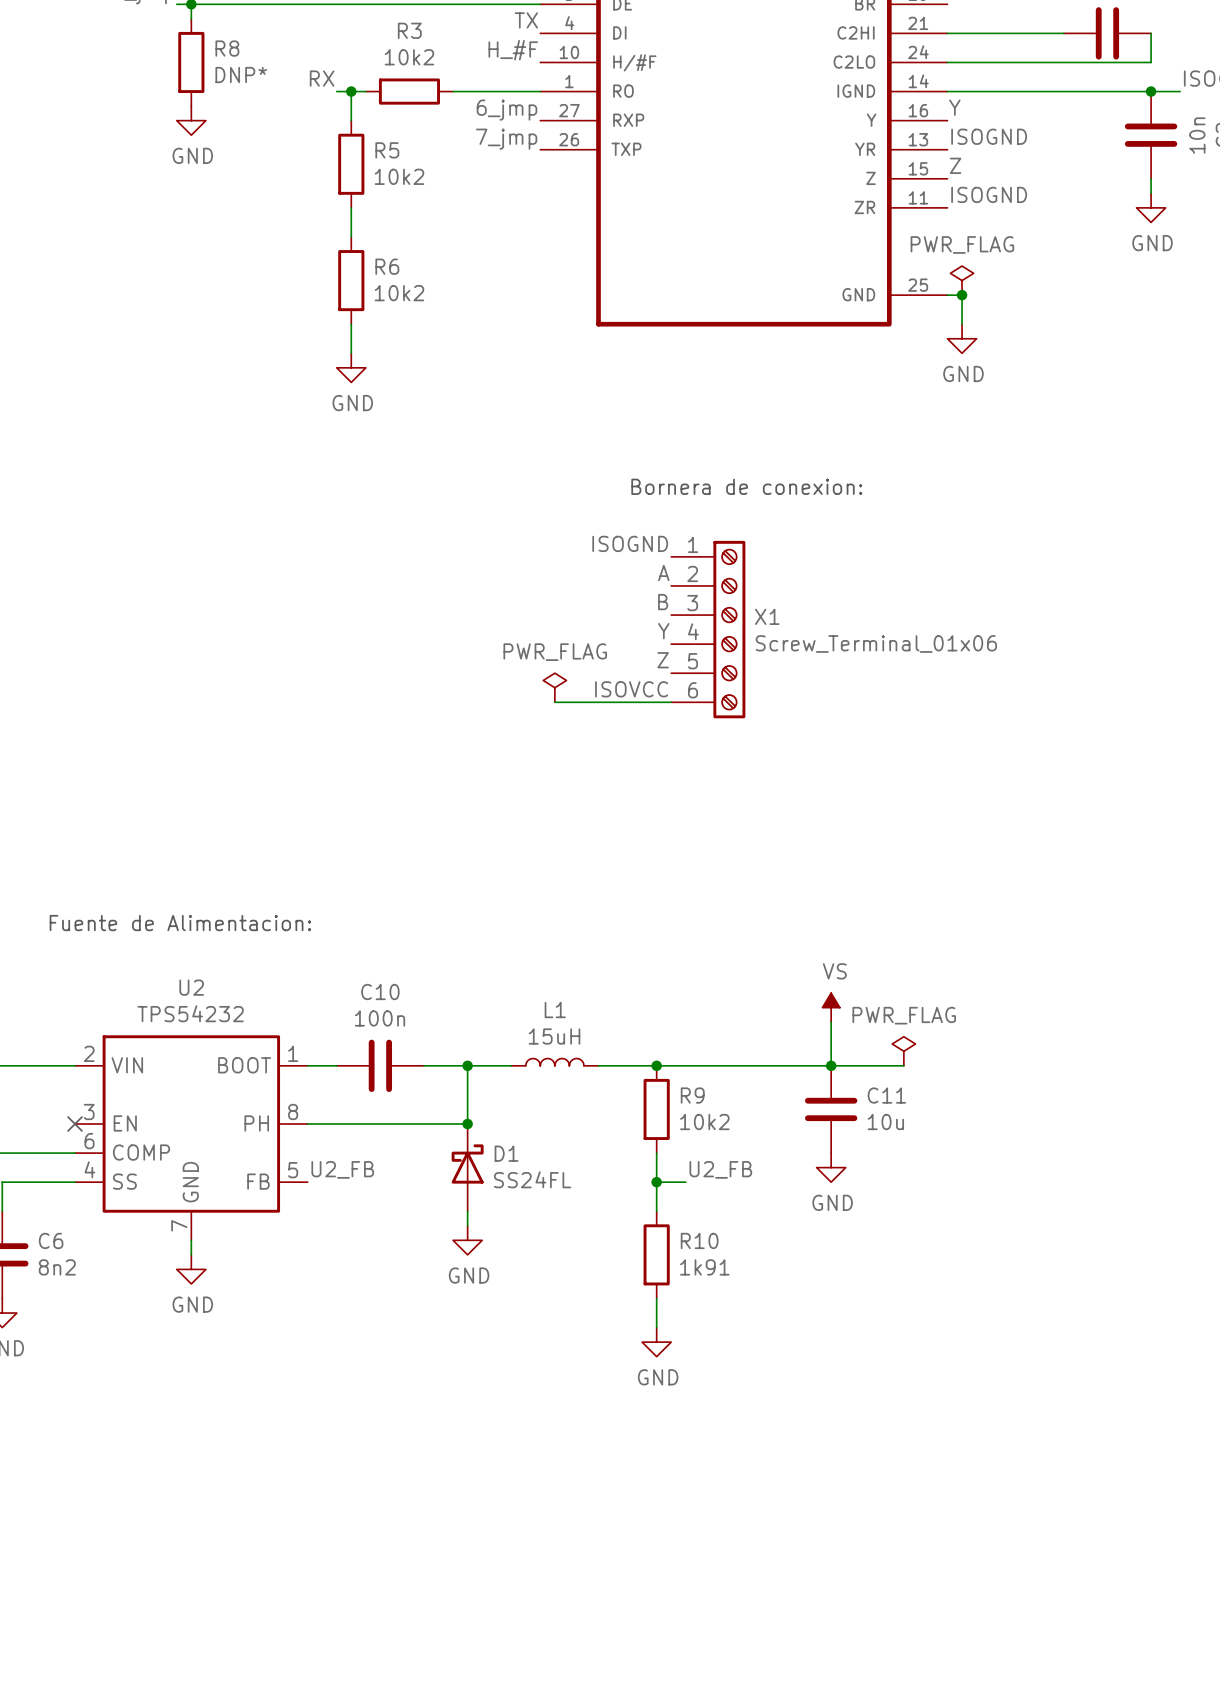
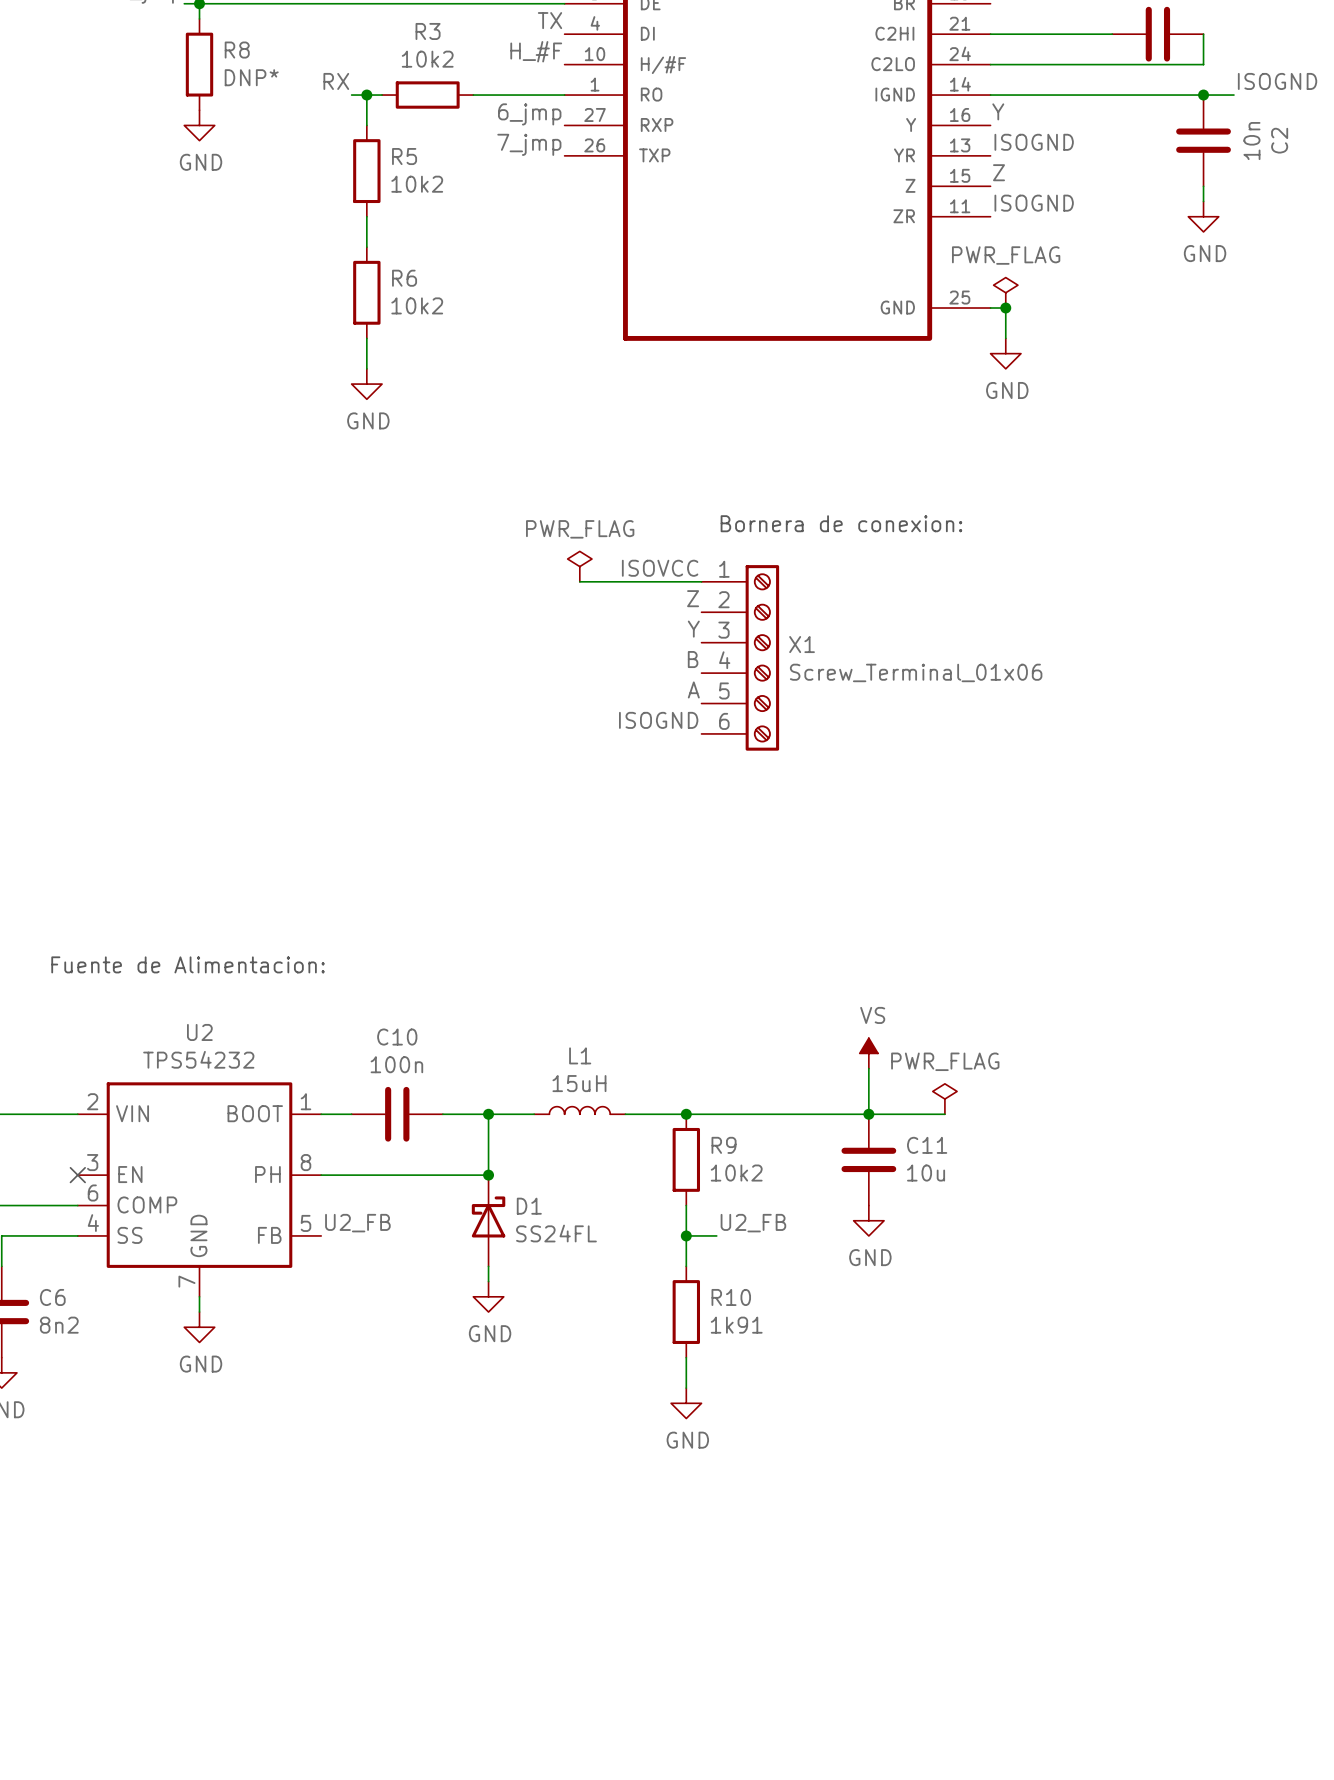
text position: Bornera de conexion: (746, 486) -> Bornera de conexion: (841, 523)
label: ISOGND (630, 543) -> ISOVCC (660, 568)
label: A (663, 572) -> Z (693, 598)
label: B (663, 602) -> Y (693, 629)
label: Y (663, 631) -> B (693, 659)
label: Z (663, 660) -> A (693, 689)
power symbol position: PWR_FLAG (554, 687) -> PWR_FLAG (579, 566)
label: ISOVCC (631, 689) -> ISOGND (658, 720)
wire: (554, 702) (671, 702) -> (579, 581) (701, 581)

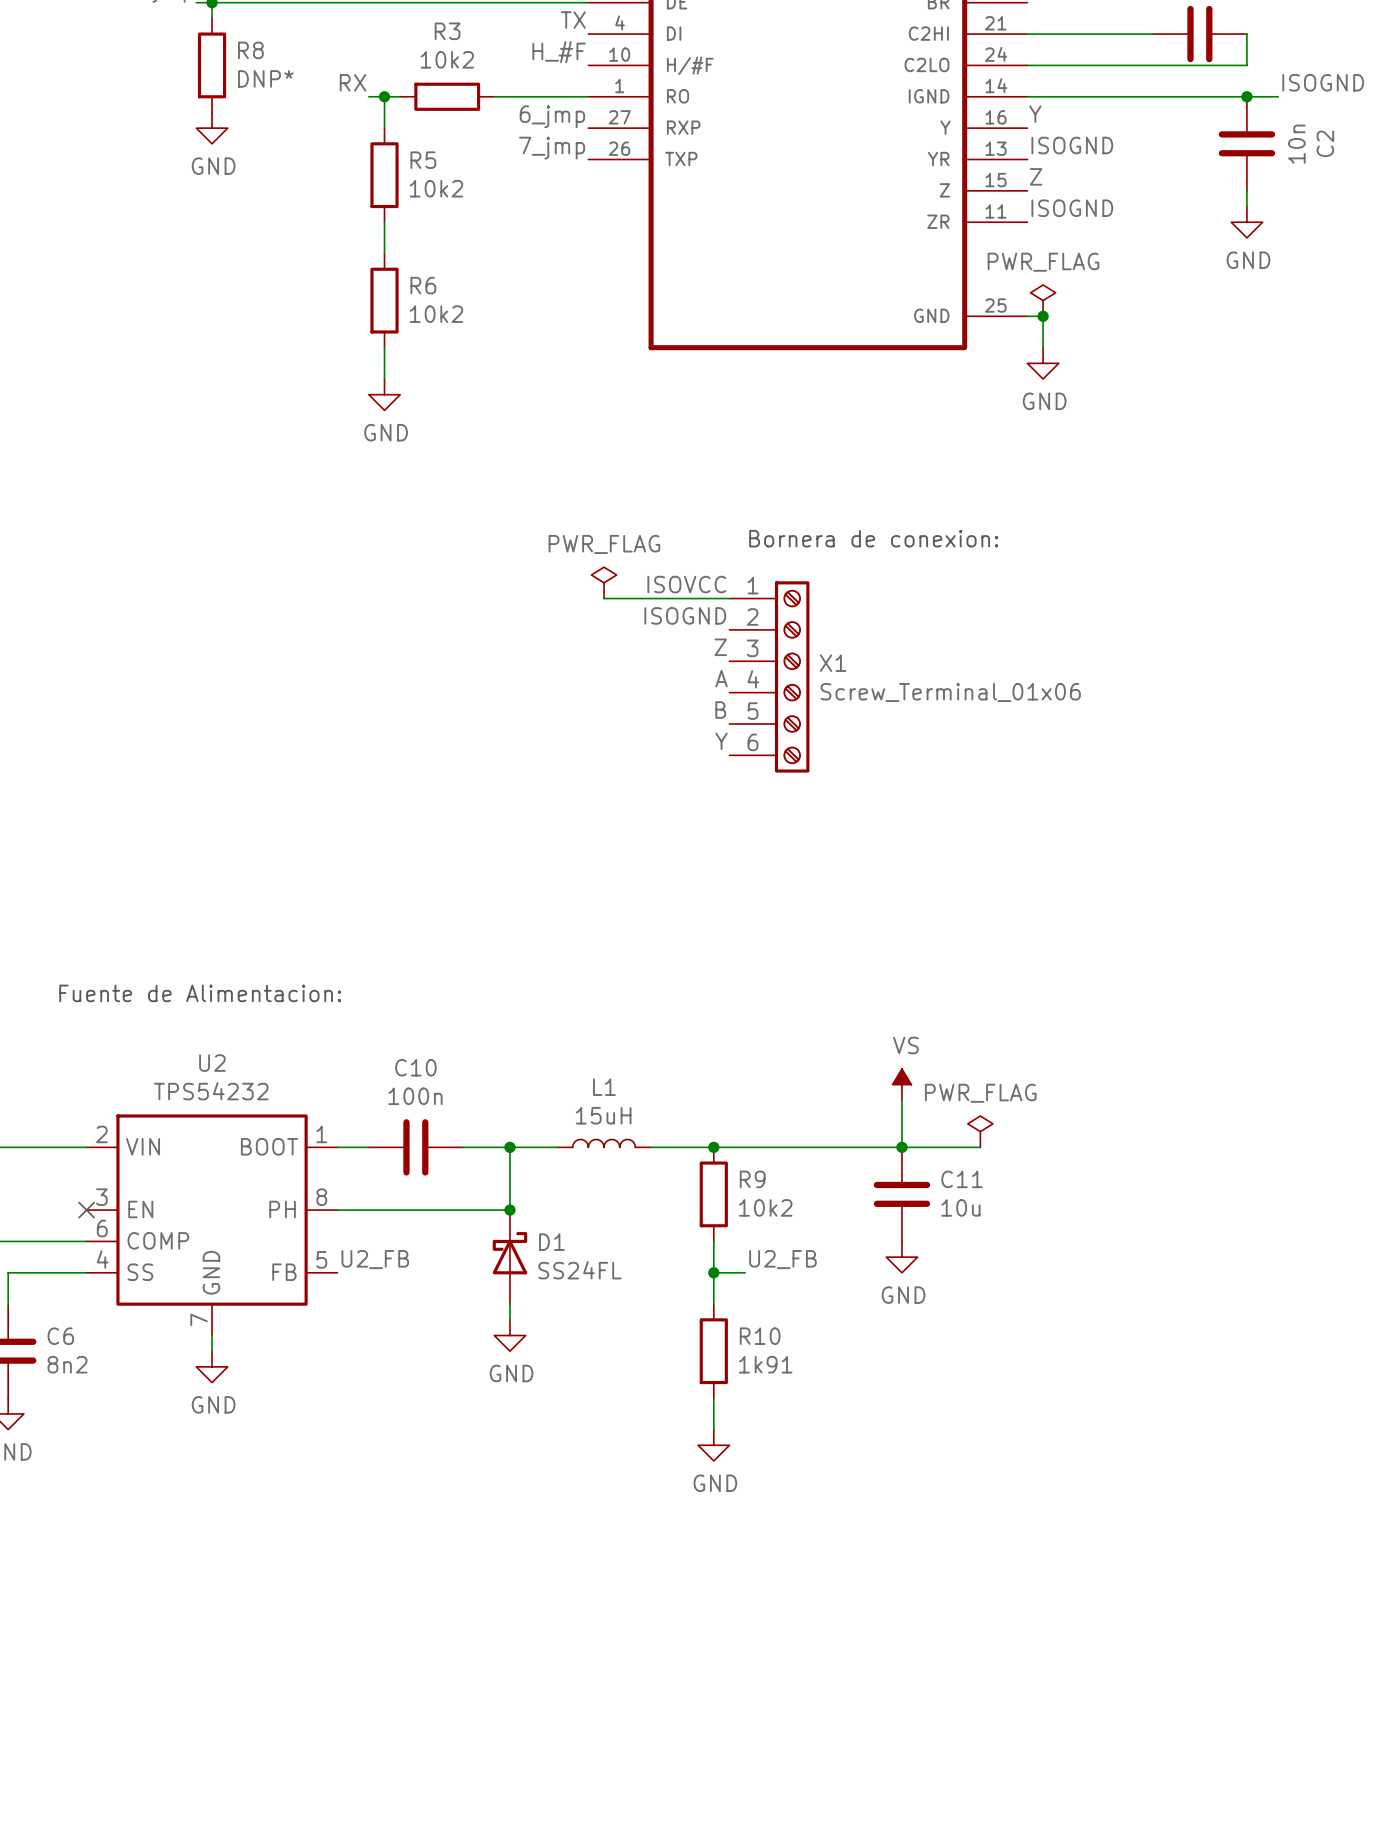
label: Z (693, 598) -> ISOGND (685, 615)
label: Y (693, 629) -> Z (720, 647)
label: B (693, 659) -> A (721, 678)
label: A (693, 689) -> B (720, 710)
label: ISOGND (658, 720) -> Y (721, 741)

